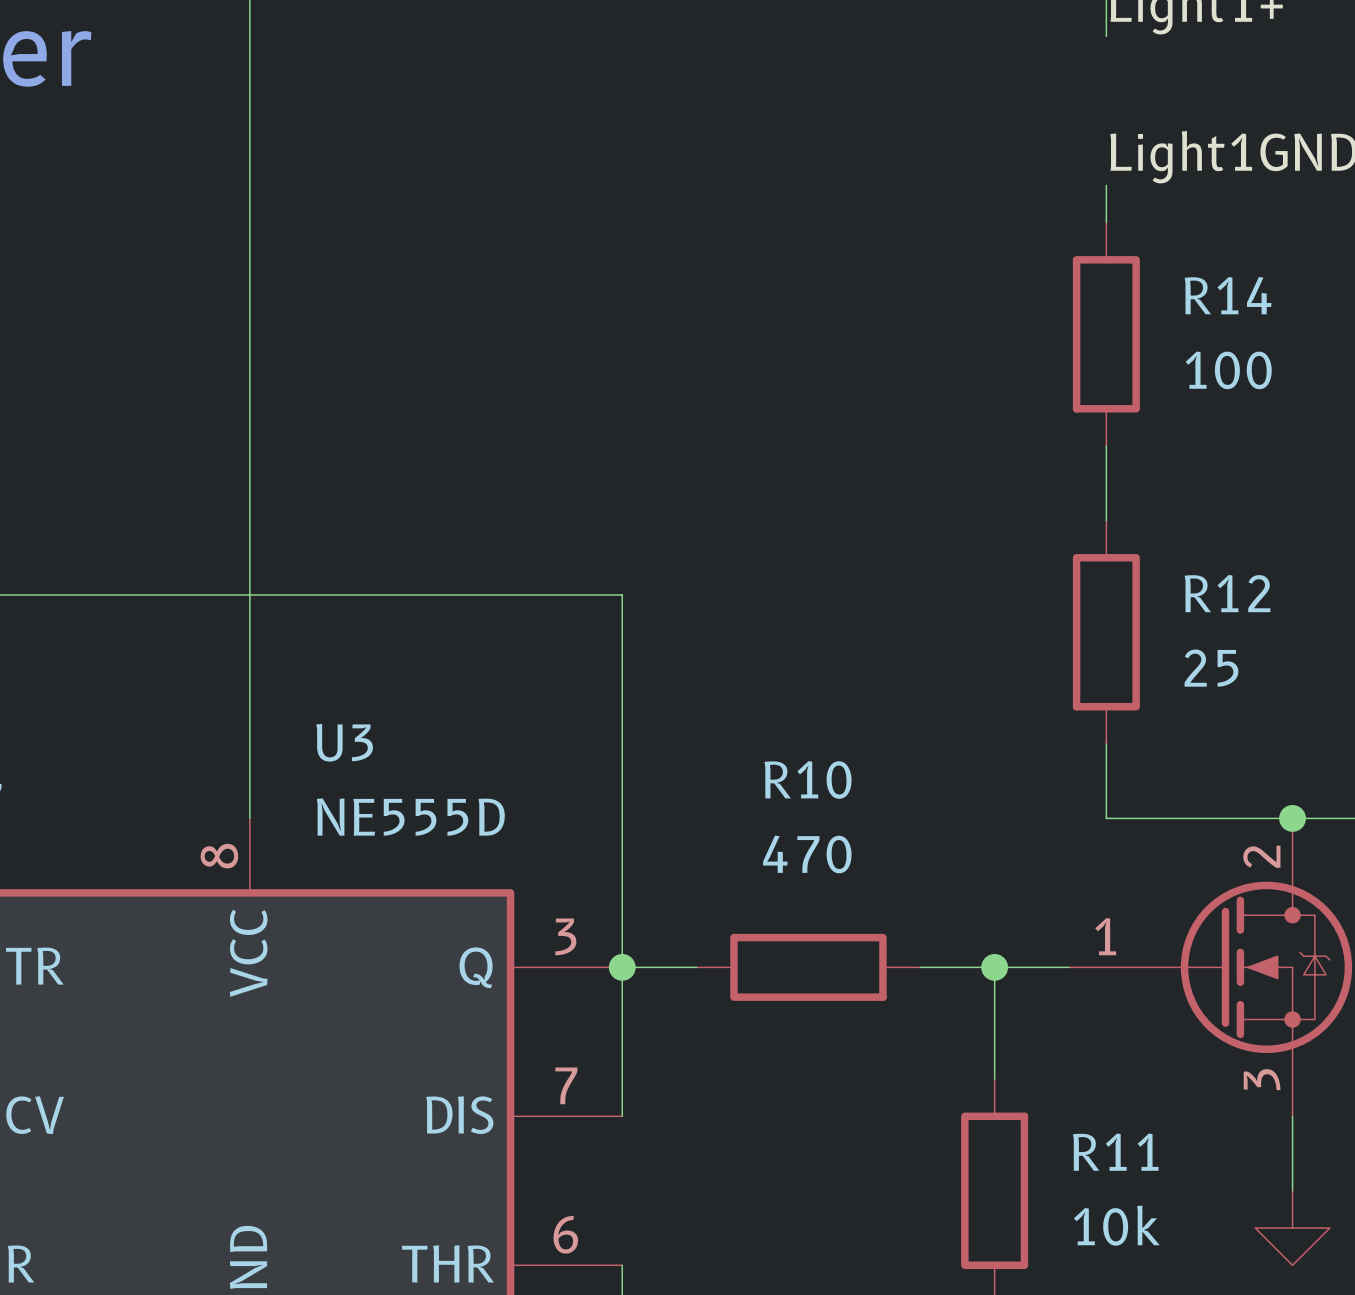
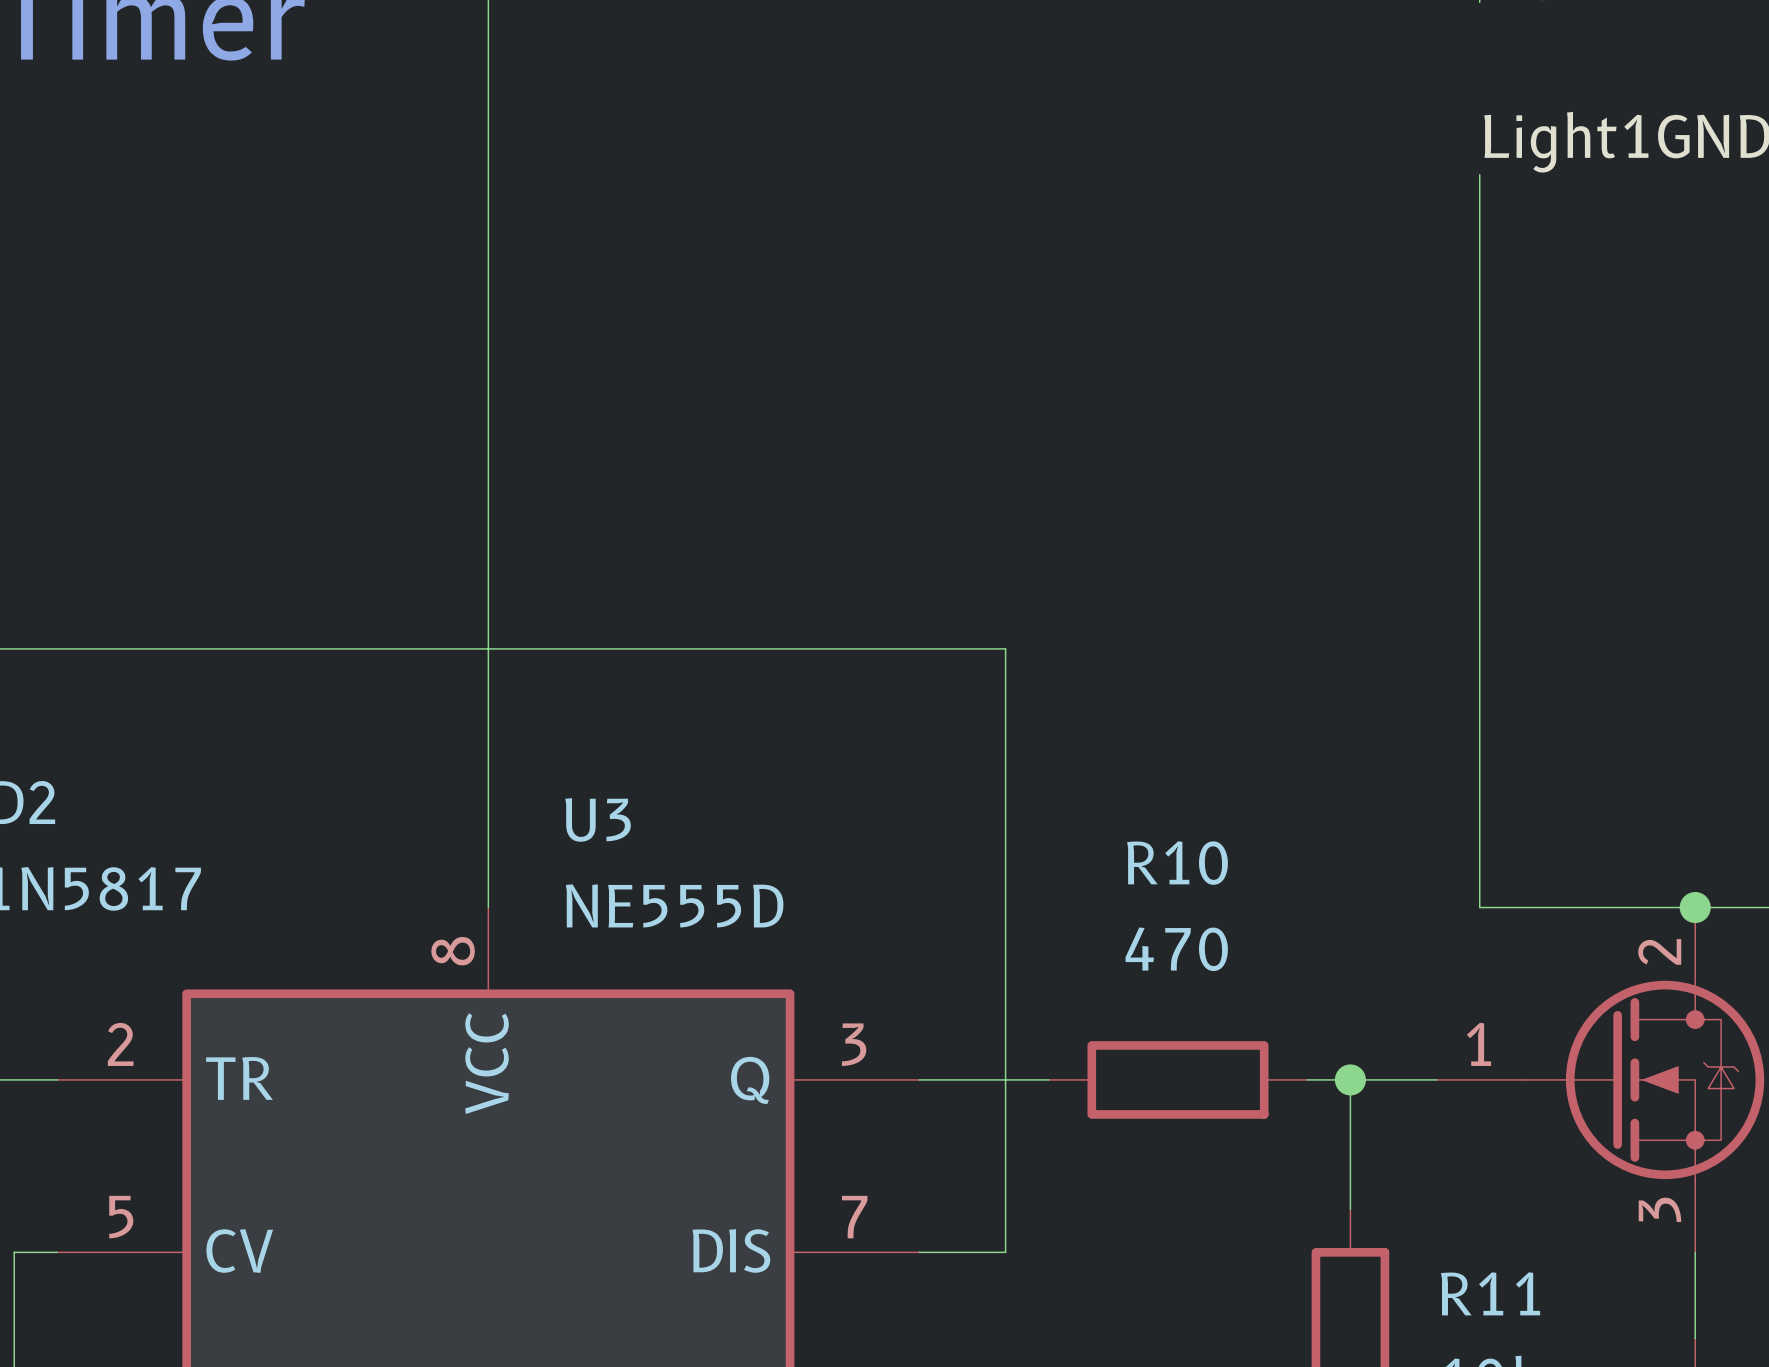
wire: none -> (1479, 217) (1479, 476)
R14: 100 (1106, 334) -> none
wire: none -> (1479, 562) (1479, 821)
wire: (622, 594) (622, 1116) -> (919, 648) (1005, 648) (1005, 1252) (919, 1252)
R12: 25 (1106, 632) -> none
junction: (622, 967) -> none
R10 position: (808, 967) -> (1178, 1079)

